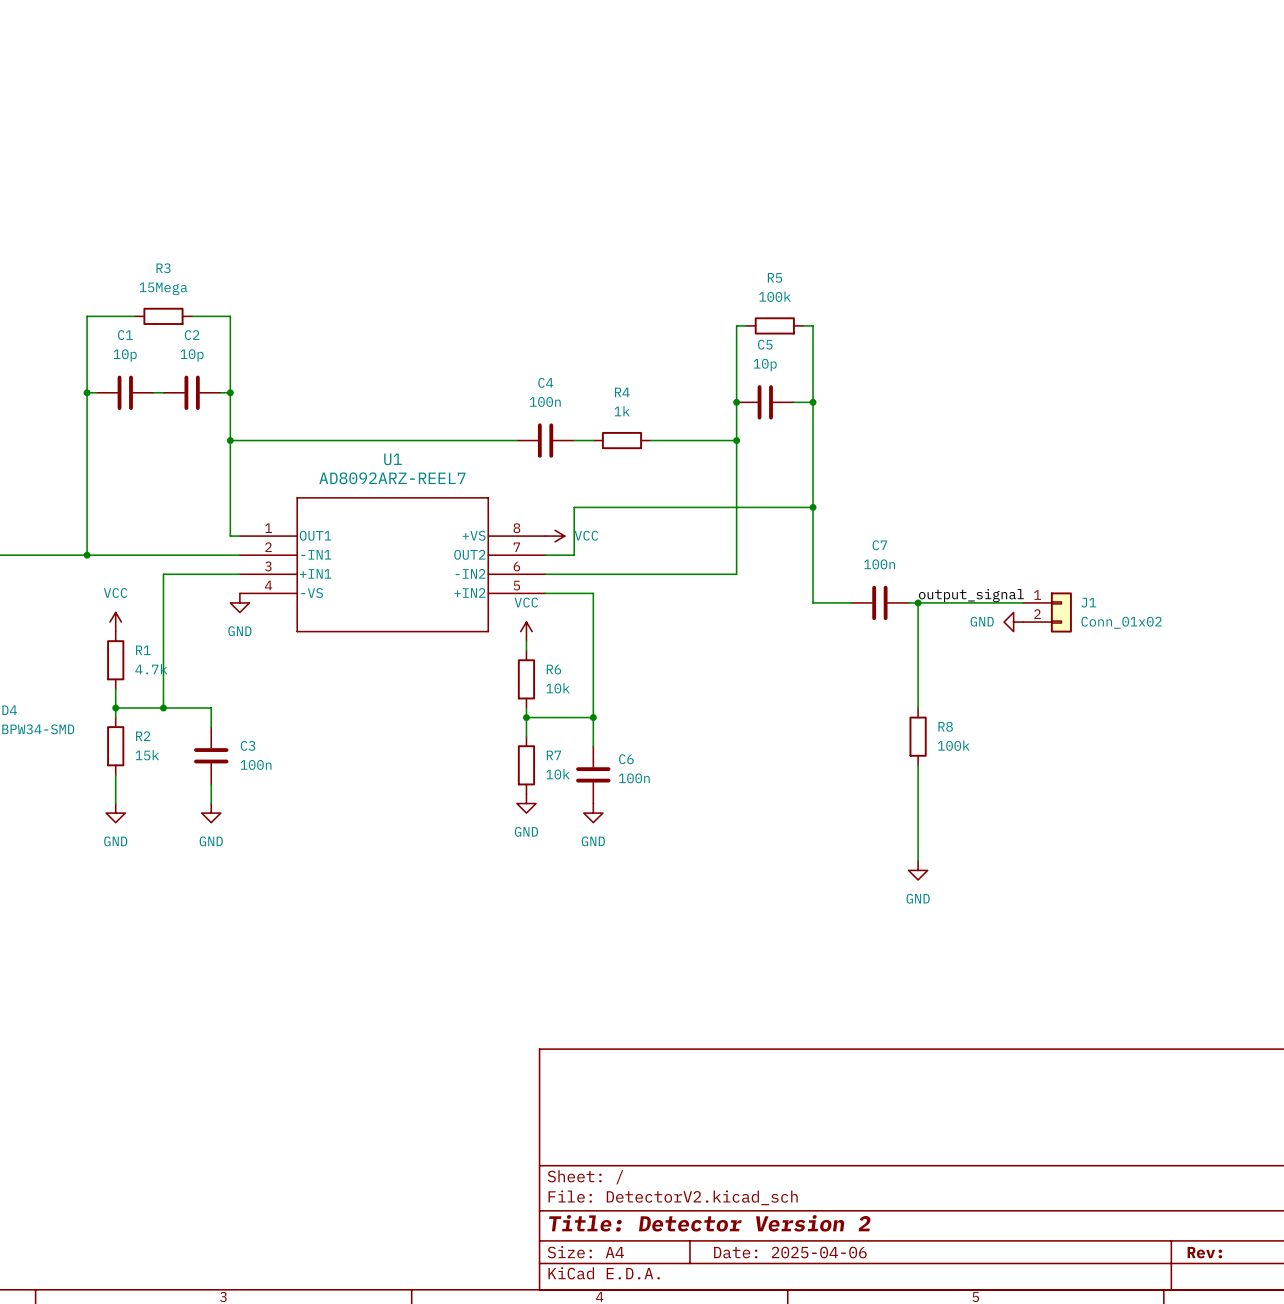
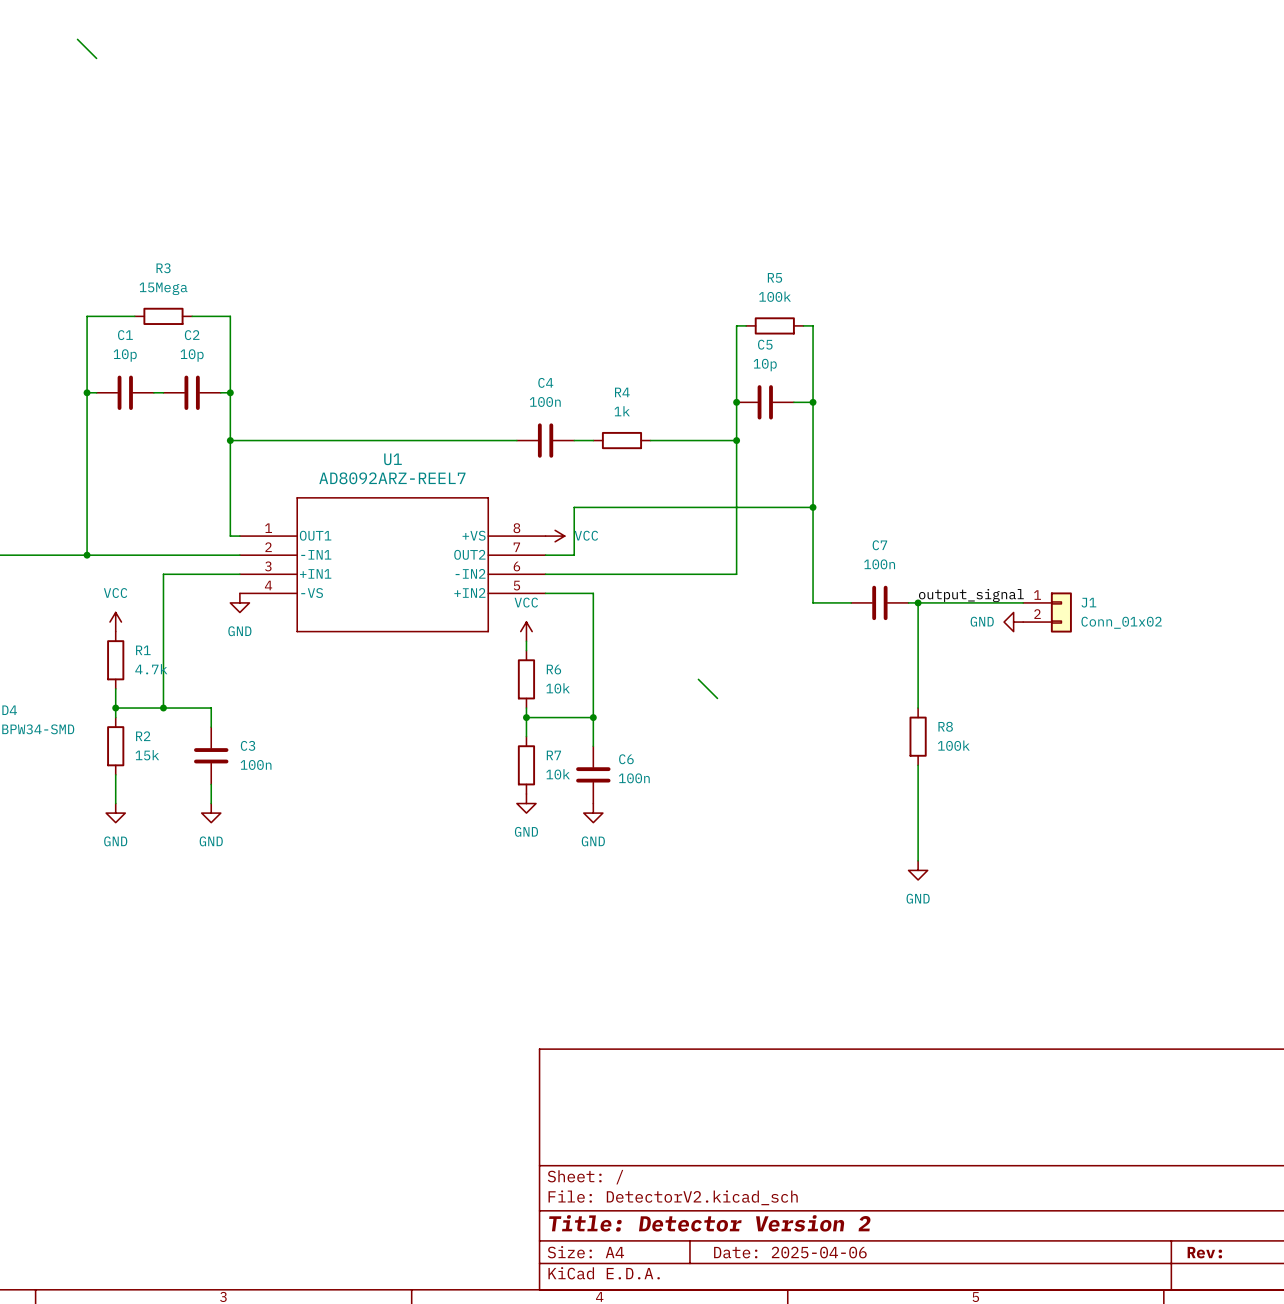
wire: none -> (77, 39) (96, 58)
wire: none -> (698, 679) (717, 698)

